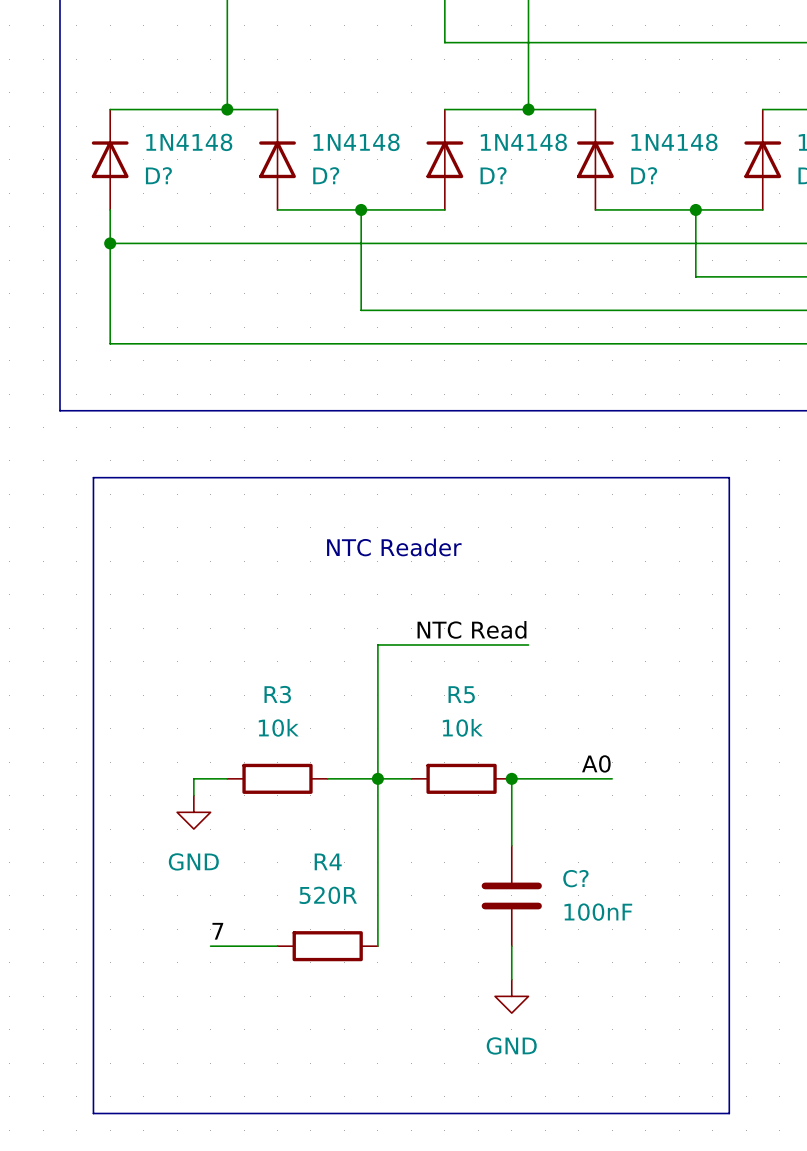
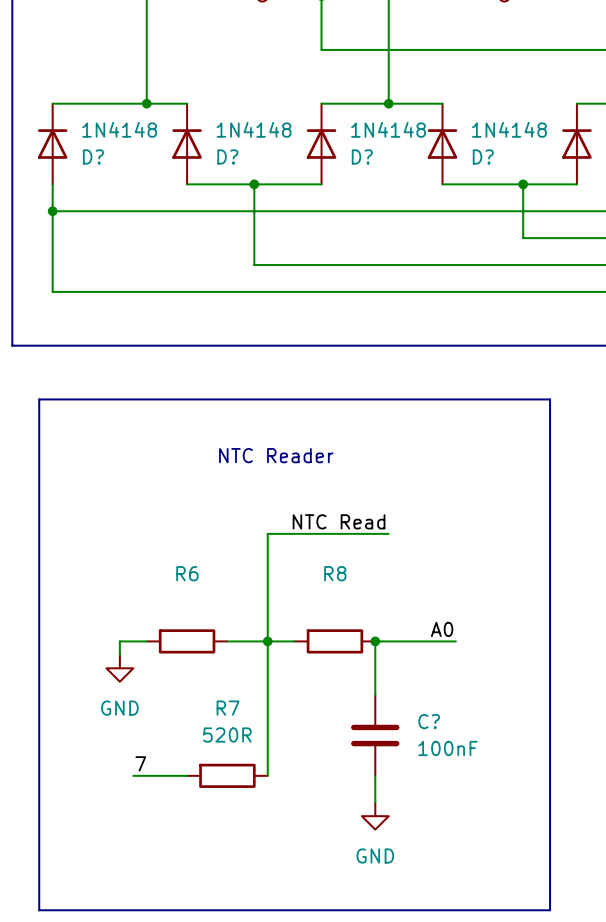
R3 name: R3 (277, 694) -> R6 (187, 573)
R5 name: R5 (461, 694) -> R8 (335, 573)
R3 value: 10k (278, 727) -> none
R5 value: 10k (462, 727) -> none
R4 name: R4 (328, 861) -> R7 (228, 708)

